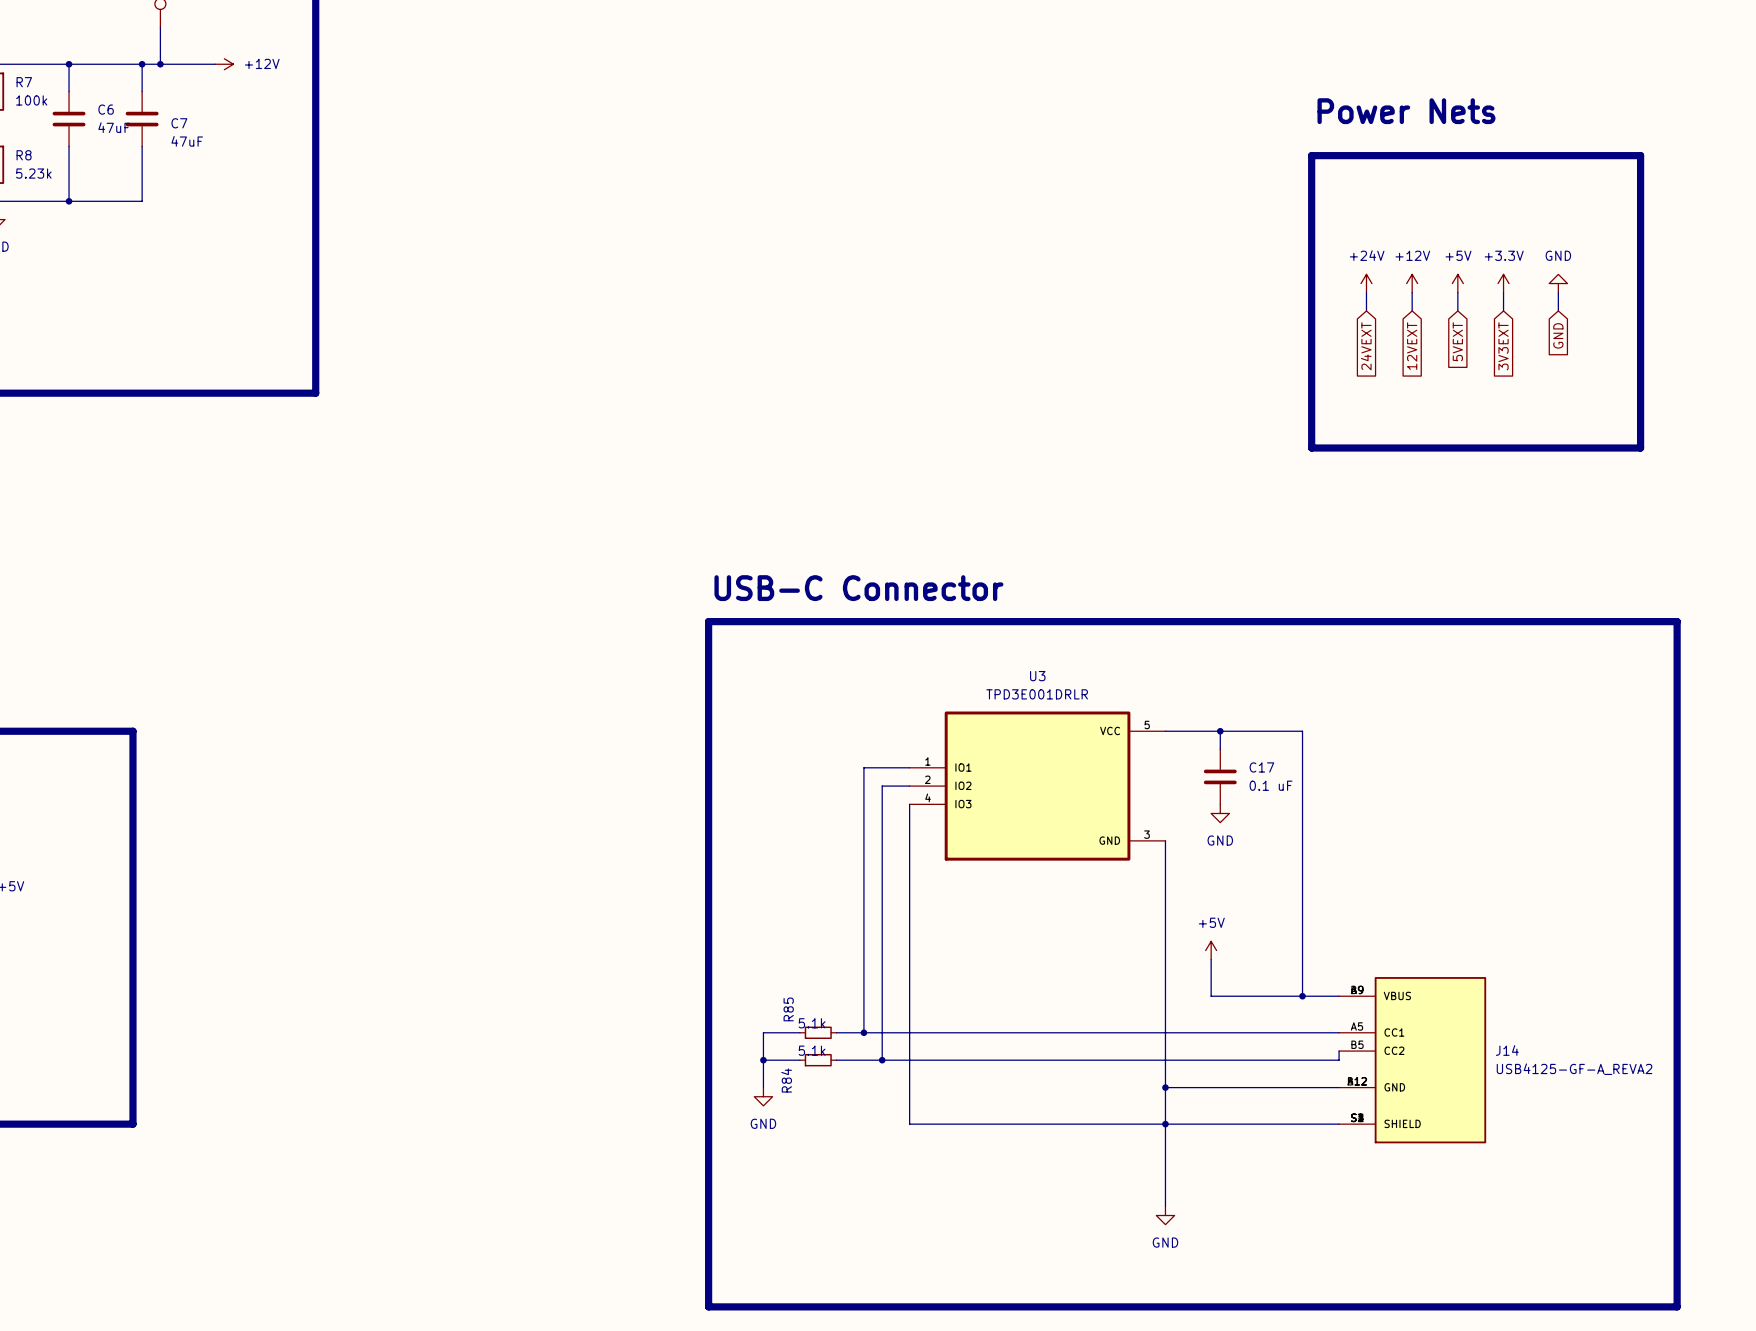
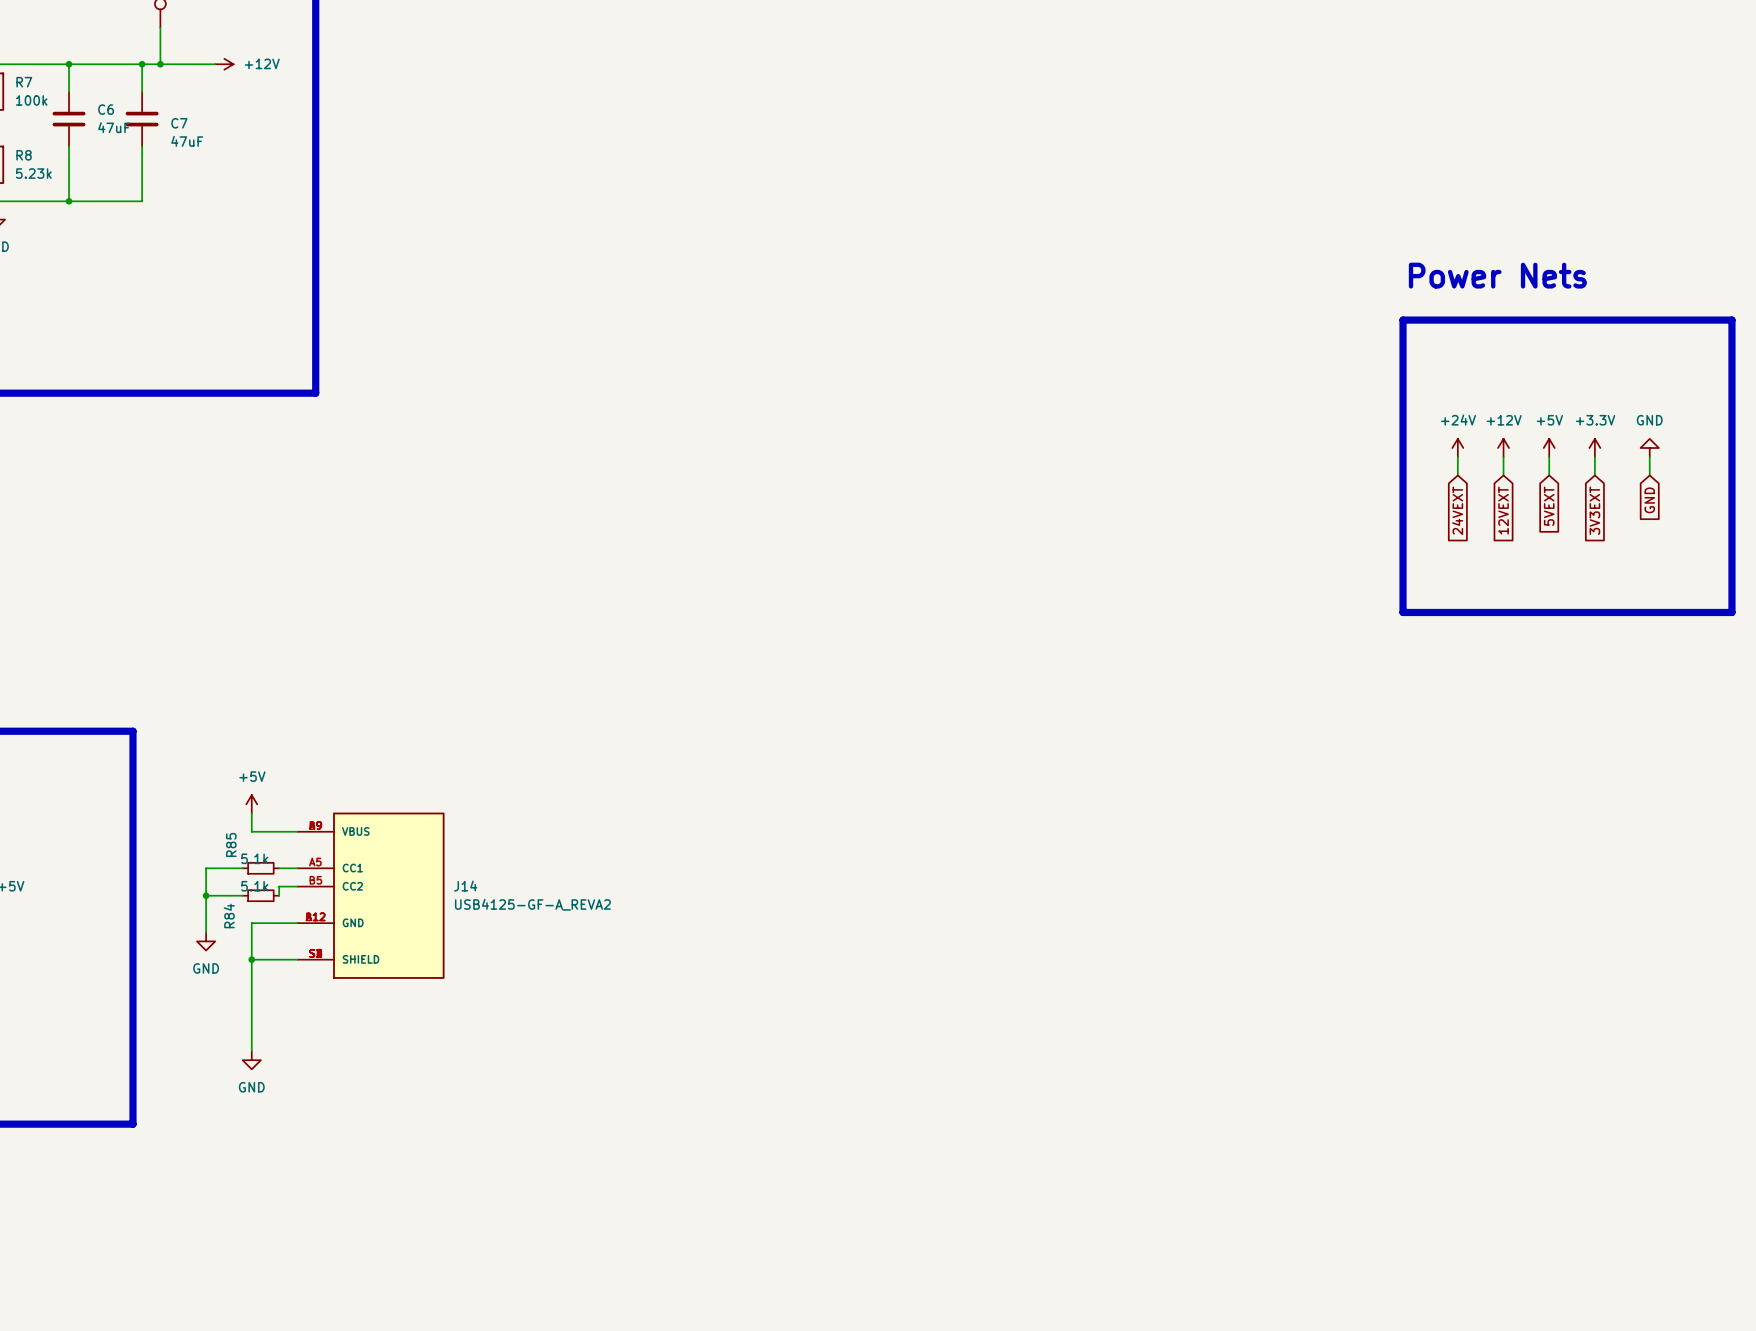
text: Power Nets (1406, 111) -> none
line: (1311, 155) (1640, 155) (1640, 448) (1311, 448) (1311, 155) -> none
text: none -> Power Nets (1497, 275)
power symbol: +24V (1366, 283) -> none
power symbol: +12V (1412, 283) -> none
power symbol: +5V (1457, 283) -> none
power symbol: +3.3V (1503, 283) -> none
power symbol: GND (1558, 283) -> none
wire: (1366, 292) (1366, 310) -> none
wire: (1412, 292) (1412, 310) -> (1457, 457) (1457, 475)
wire: (1457, 292) (1457, 310) -> (1503, 457) (1503, 475)
wire: (1503, 292) (1503, 310) -> (1549, 457) (1549, 475)
wire: (1558, 292) (1558, 310) -> (1594, 457) (1594, 475)
line: none -> (1403, 320) (1731, 320) (1731, 612) (1403, 612) (1403, 320)
global label: GND (1558, 335) -> none
global label: 5VEXT (1457, 341) -> none
global label: 24VEXT (1366, 346) -> none
global label: 12VEXT (1412, 346) -> none
global label: 3V3EXT (1503, 346) -> none
power symbol: none -> +24V (1457, 448)
power symbol: none -> +12V (1503, 448)
power symbol: none -> +5V (1549, 448)
power symbol: none -> +3.3V (1594, 448)
power symbol: none -> GND (1649, 448)
wire: none -> (1649, 457) (1649, 475)
global label: none -> GND (1649, 500)
global label: none -> 5VEXT (1549, 506)
global label: none -> 24VEXT (1457, 510)
global label: none -> 12VEXT (1503, 510)
global label: none -> 3V3EXT (1594, 510)
text: USB-C Connector (858, 588) -> none
line: (708, 621) (1677, 621) (1677, 1306) (708, 1306) (708, 621) -> none
wire: (1165, 731) (1302, 731) (1302, 996) -> none
wire: (1220, 731) (1220, 749) -> none
junction: (1220, 731) -> none
wire: (909, 767) (863, 767) (863, 1032) -> none
C17: 0.1 uF (1220, 776) -> none
wire: (909, 786) (882, 786) (882, 1060) -> none
U3: TPD3E001DRLR (1037, 786) -> none
power symbol: none -> +5V (251, 804)
wire: (909, 804) (909, 1124) (1339, 1124) -> none
wire: none -> (251, 813) (251, 831) (297, 831)
power symbol: GND (1220, 813) -> none
wire: (1165, 840) (1165, 1206) -> none
wire: none -> (242, 868) (206, 868) (206, 932)
wire: none -> (279, 868) (297, 868)
wire: none -> (297, 886) (279, 886) (279, 895)
wire: none -> (206, 895) (242, 895)
junction: none -> (206, 895)
wire: none -> (297, 923) (251, 923) (251, 1051)
power symbol: none -> GND (206, 941)
power symbol: +5V (1211, 950) -> none
wire: none -> (251, 959) (297, 959)
junction: none -> (251, 959)
wire: (1211, 959) (1211, 996) (1339, 996) -> none
junction: (1302, 996) -> none
wire: (799, 1032) (763, 1032) (763, 1087) -> none
R85 position: (818, 1032) -> (260, 868)
wire: (836, 1032) (1339, 1032) -> none
junction: (863, 1032) -> none
wire: (1339, 1051) (1339, 1060) (836, 1060) -> none
power symbol: none -> GND (251, 1060)
wire: (763, 1060) (799, 1060) -> none
junction: (763, 1060) -> none
R84 position: (818, 1060) -> (260, 895)
junction: (882, 1060) -> none
J14 position: (1412, 1060) -> (371, 895)
wire: (1165, 1087) (1339, 1087) -> none
junction: (1165, 1087) -> none
power symbol: GND (763, 1096) -> none
junction: (1165, 1124) -> none
power symbol: GND (1165, 1215) -> none

